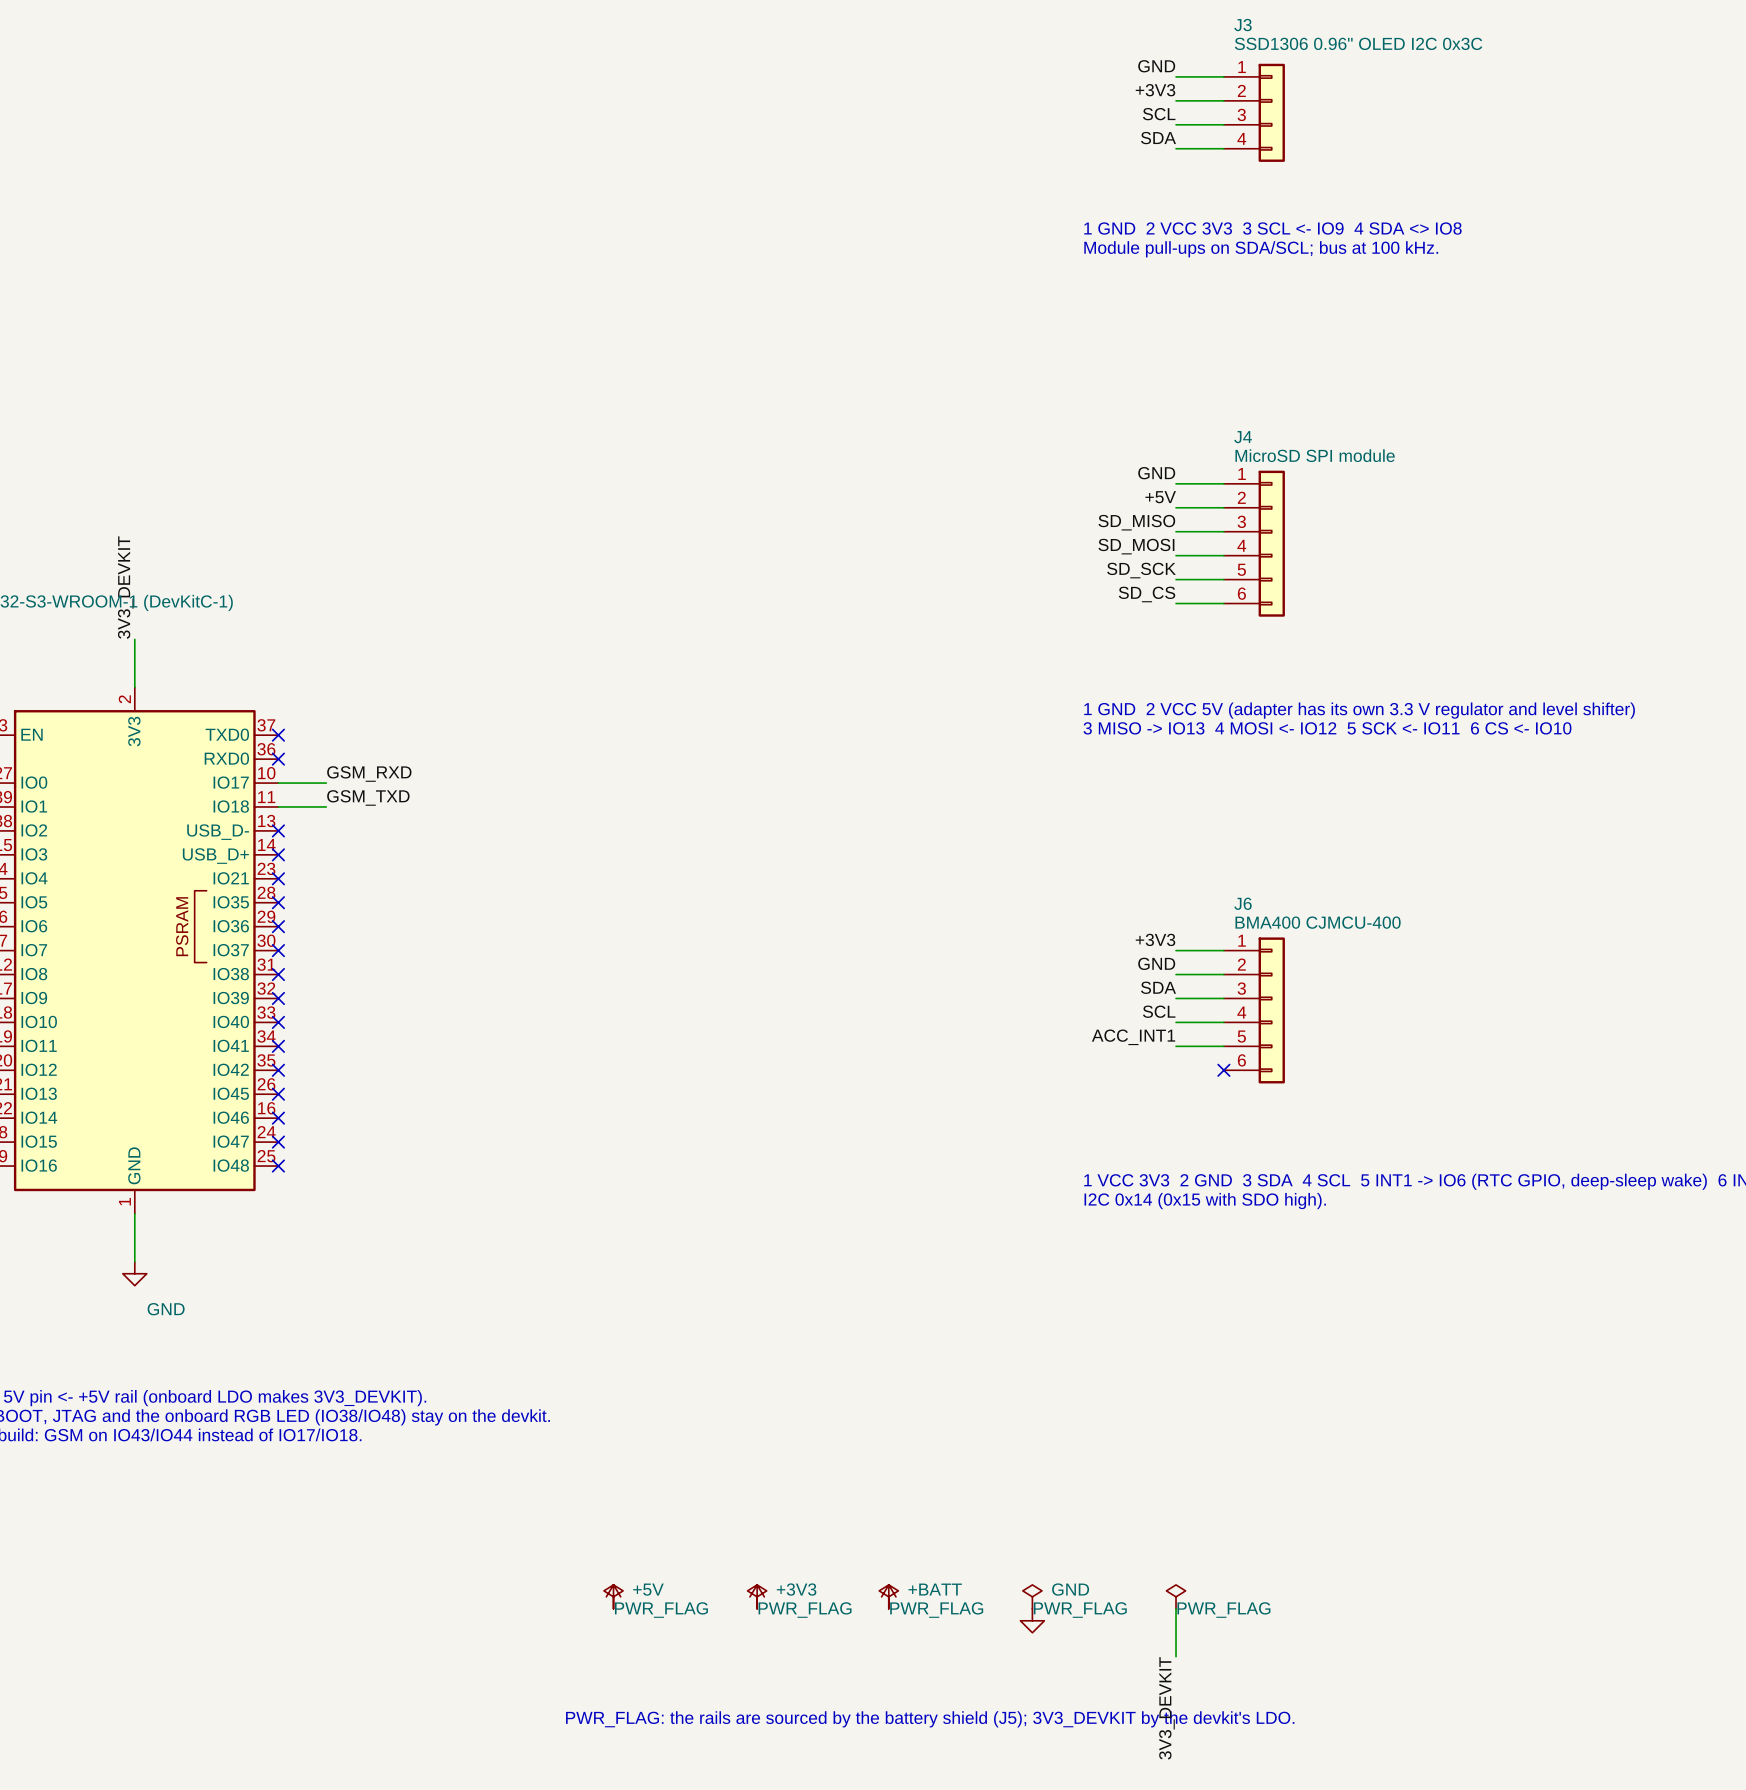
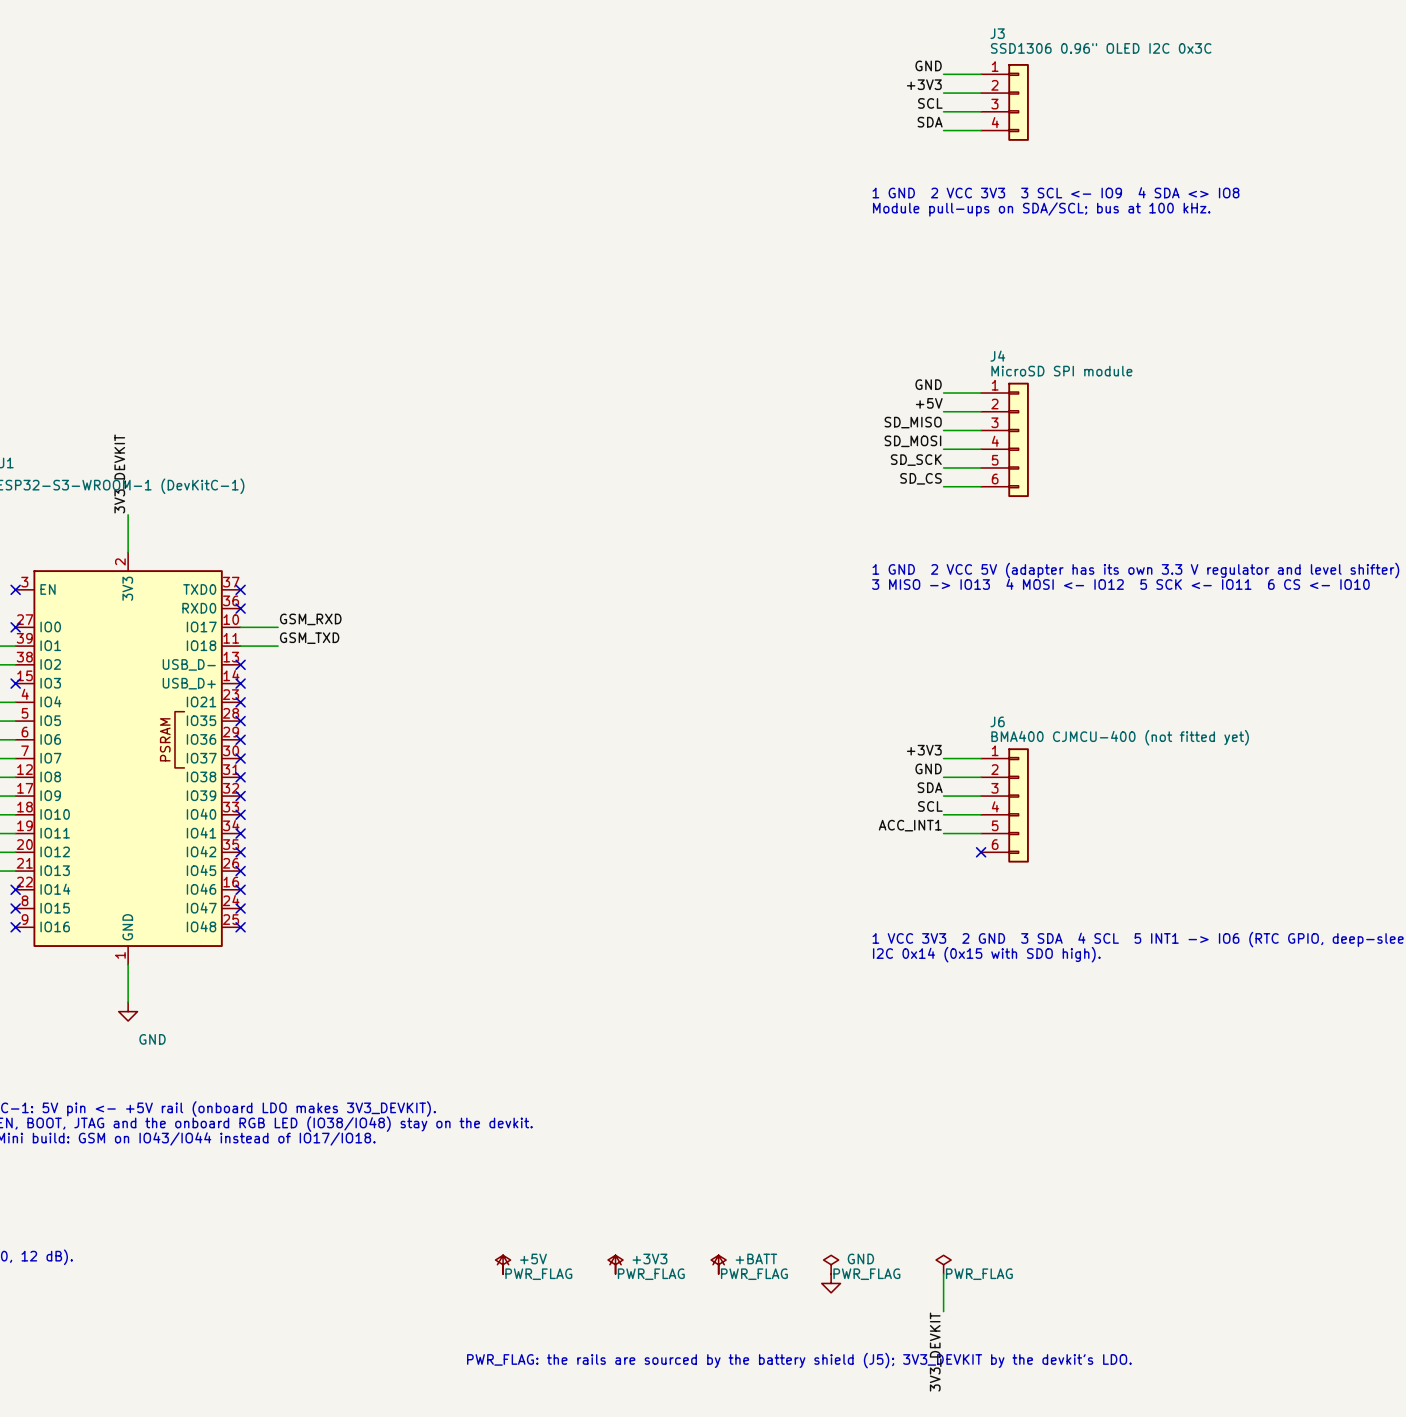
J6 value: BMA400 CJMCU-400 (1318, 922) -> BMA400 CJMCU-400 (not fitted yet) (1120, 737)

